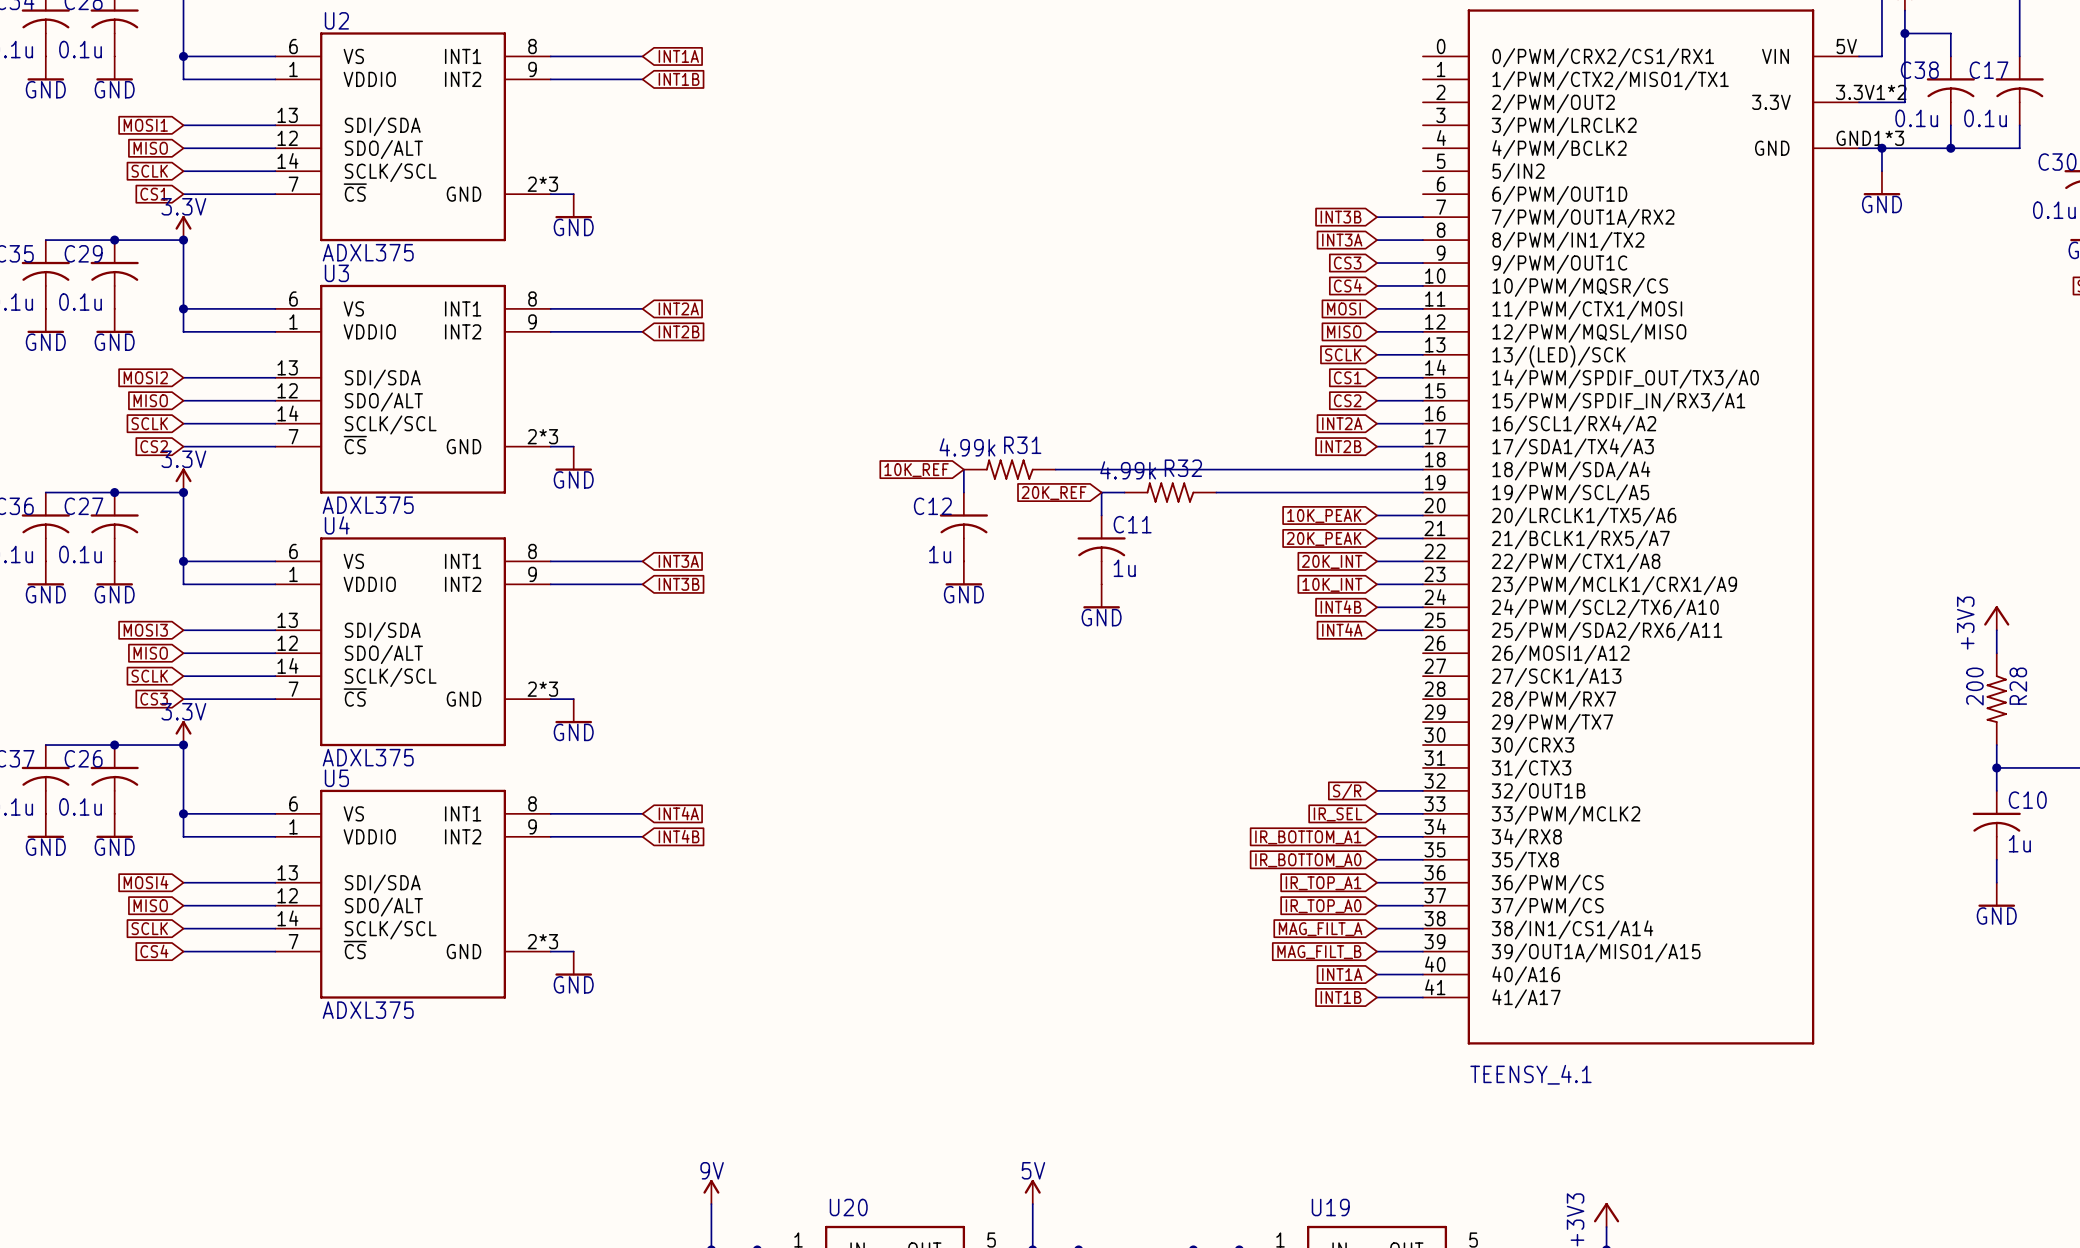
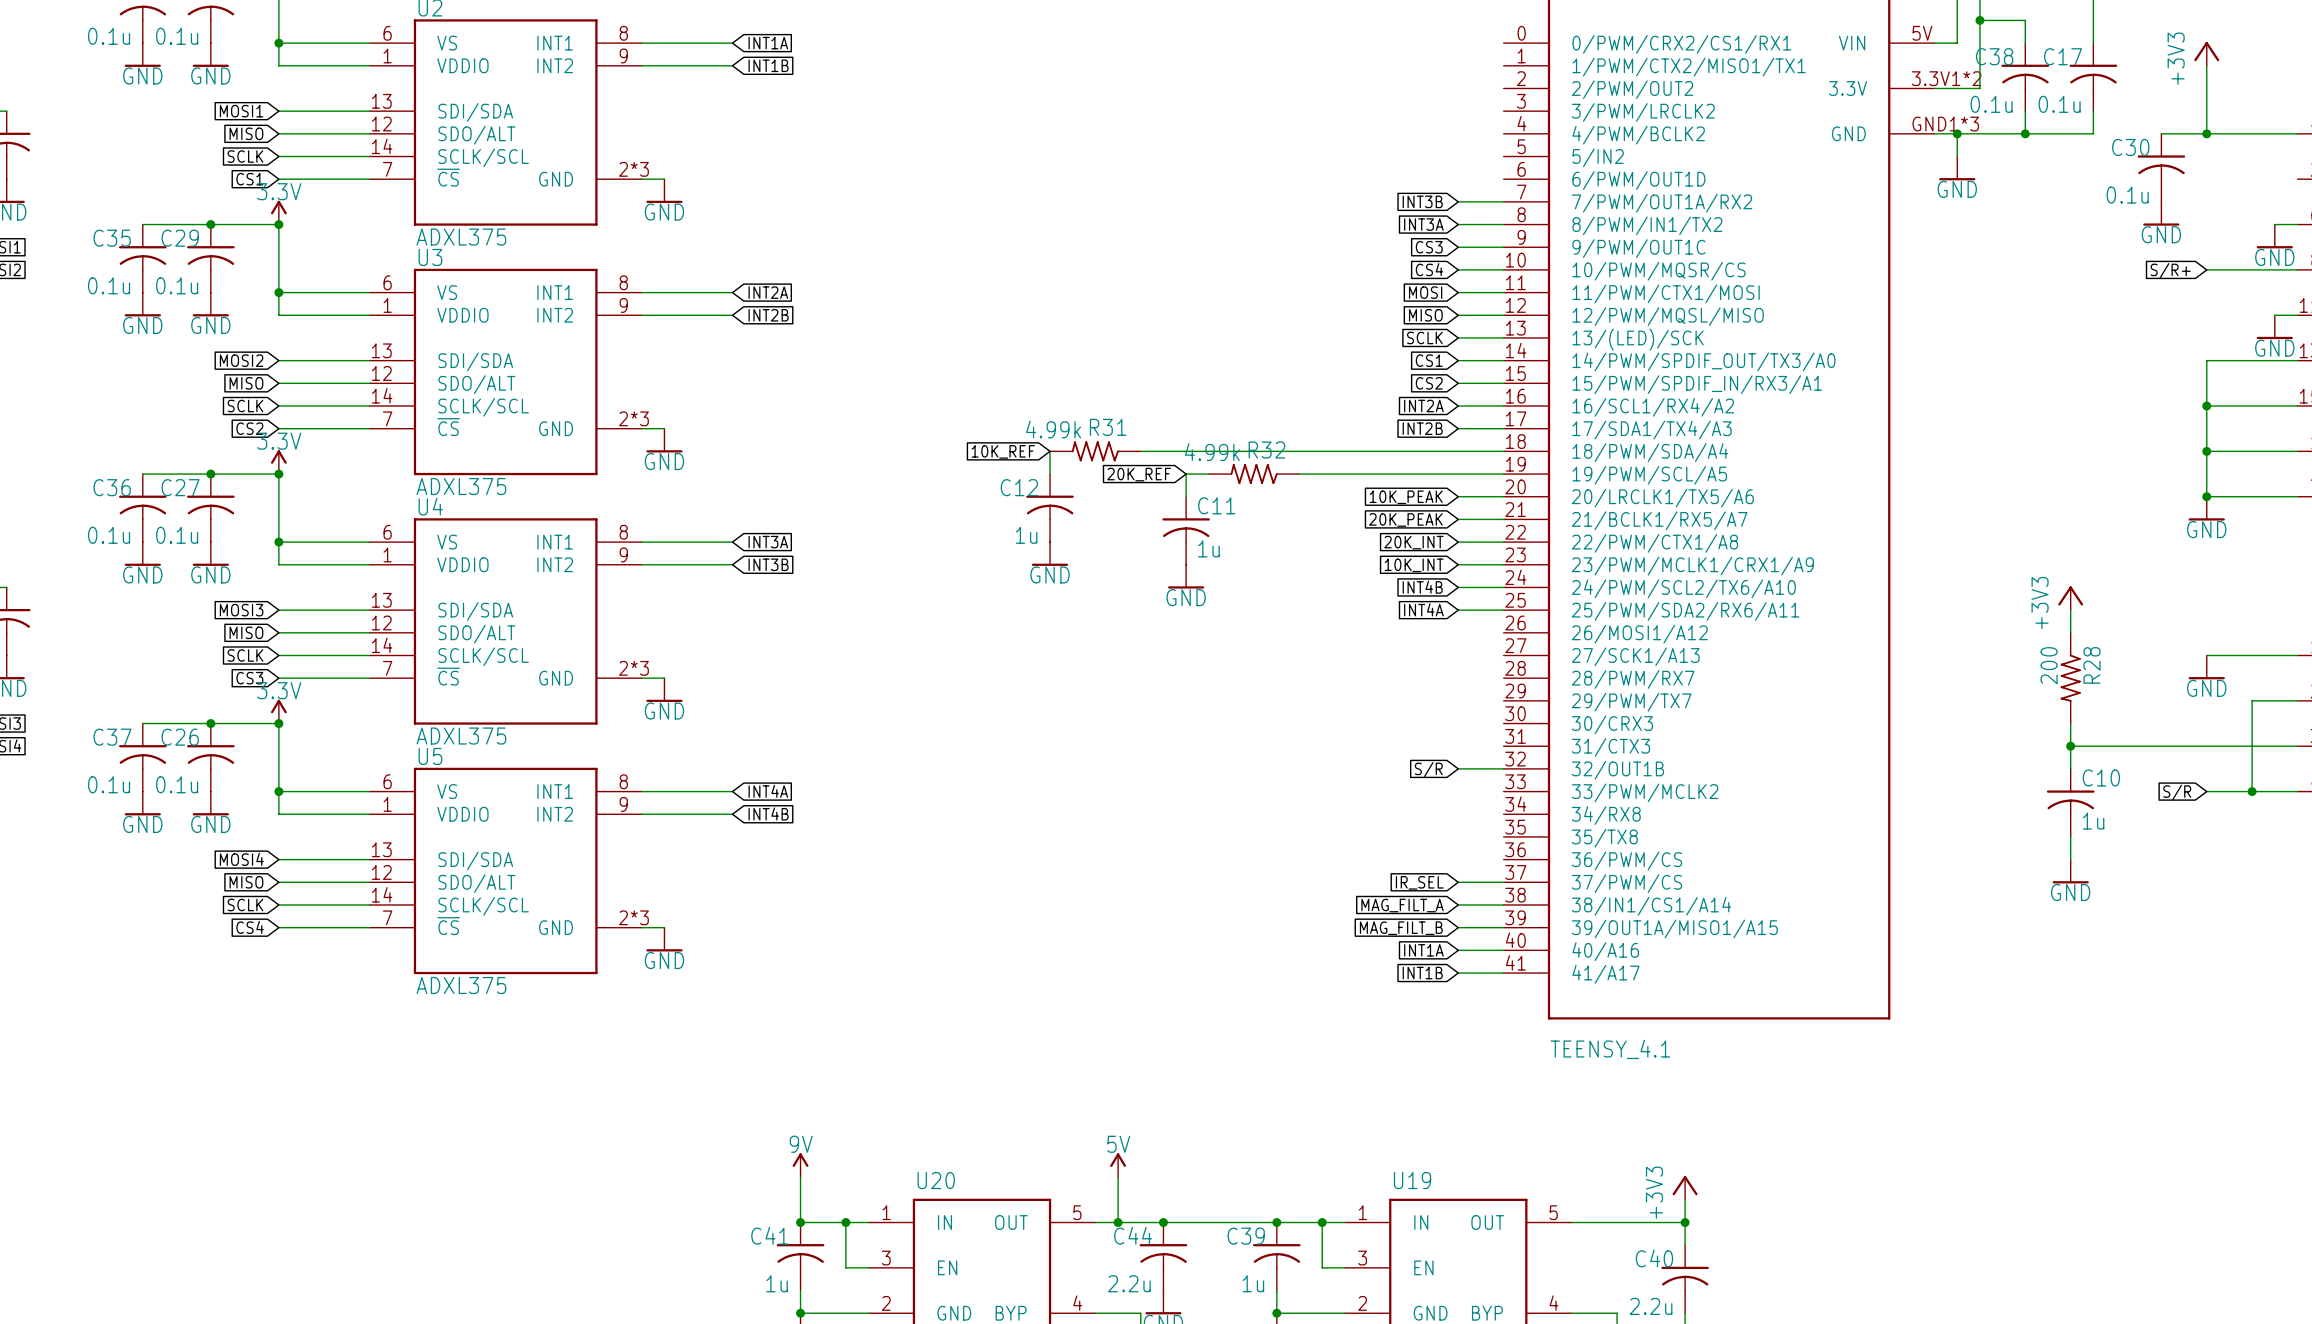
wire: (1377, 813) (1422, 813) -> none
global label: IR_SEL (1338, 814) -> none
wire: (1377, 836) (1422, 836) -> none
global label: IR_BOTTOM_A1 (1308, 837) -> none
wire: (1377, 859) (1422, 859) -> none
global label: IR_BOTTOM_A0 (1308, 860) -> none
wire: (1377, 882) (1422, 882) -> none
global label: IR_TOP_A1 (1323, 883) -> none
global label: IR_TOP_A0 (1323, 906) -> IR_SEL (1419, 882)

